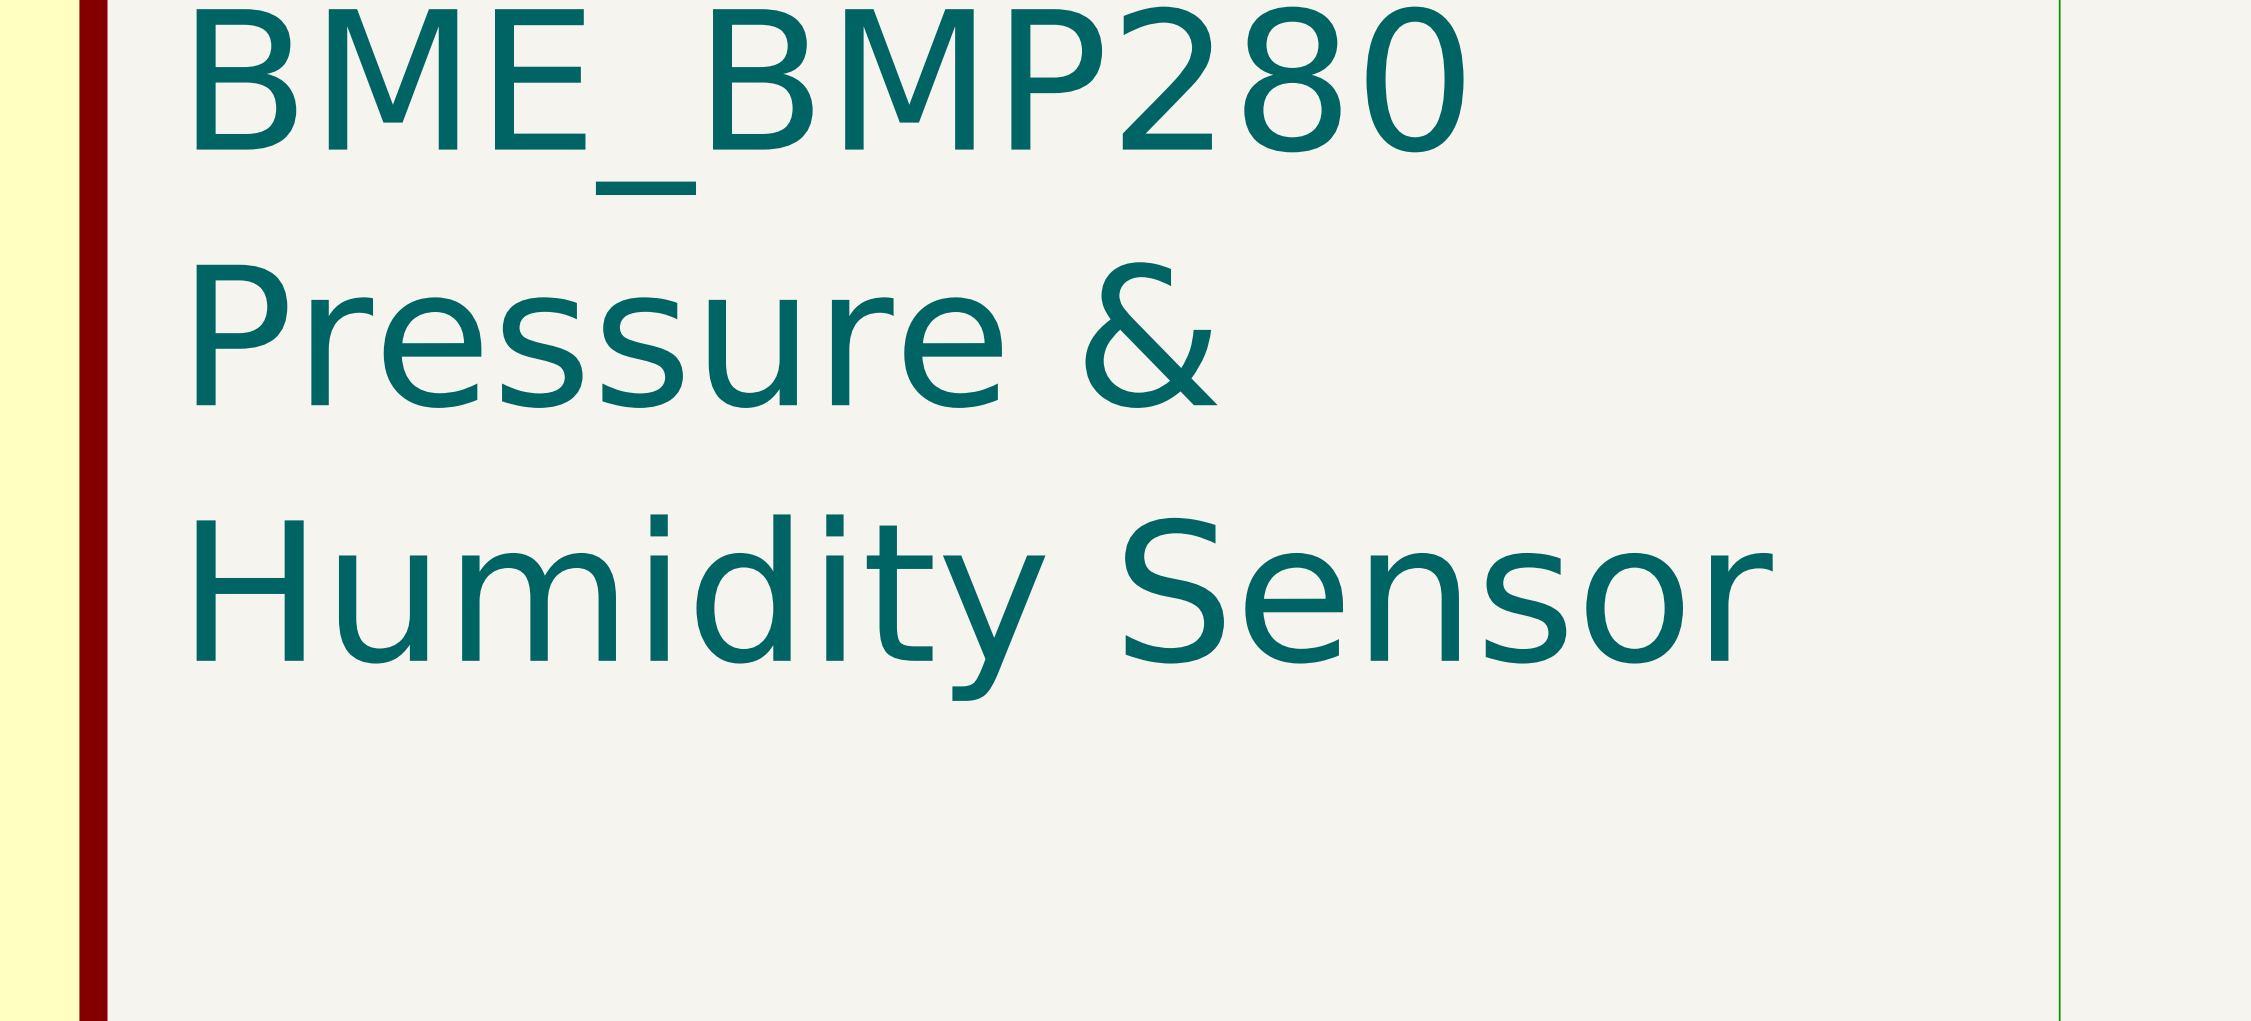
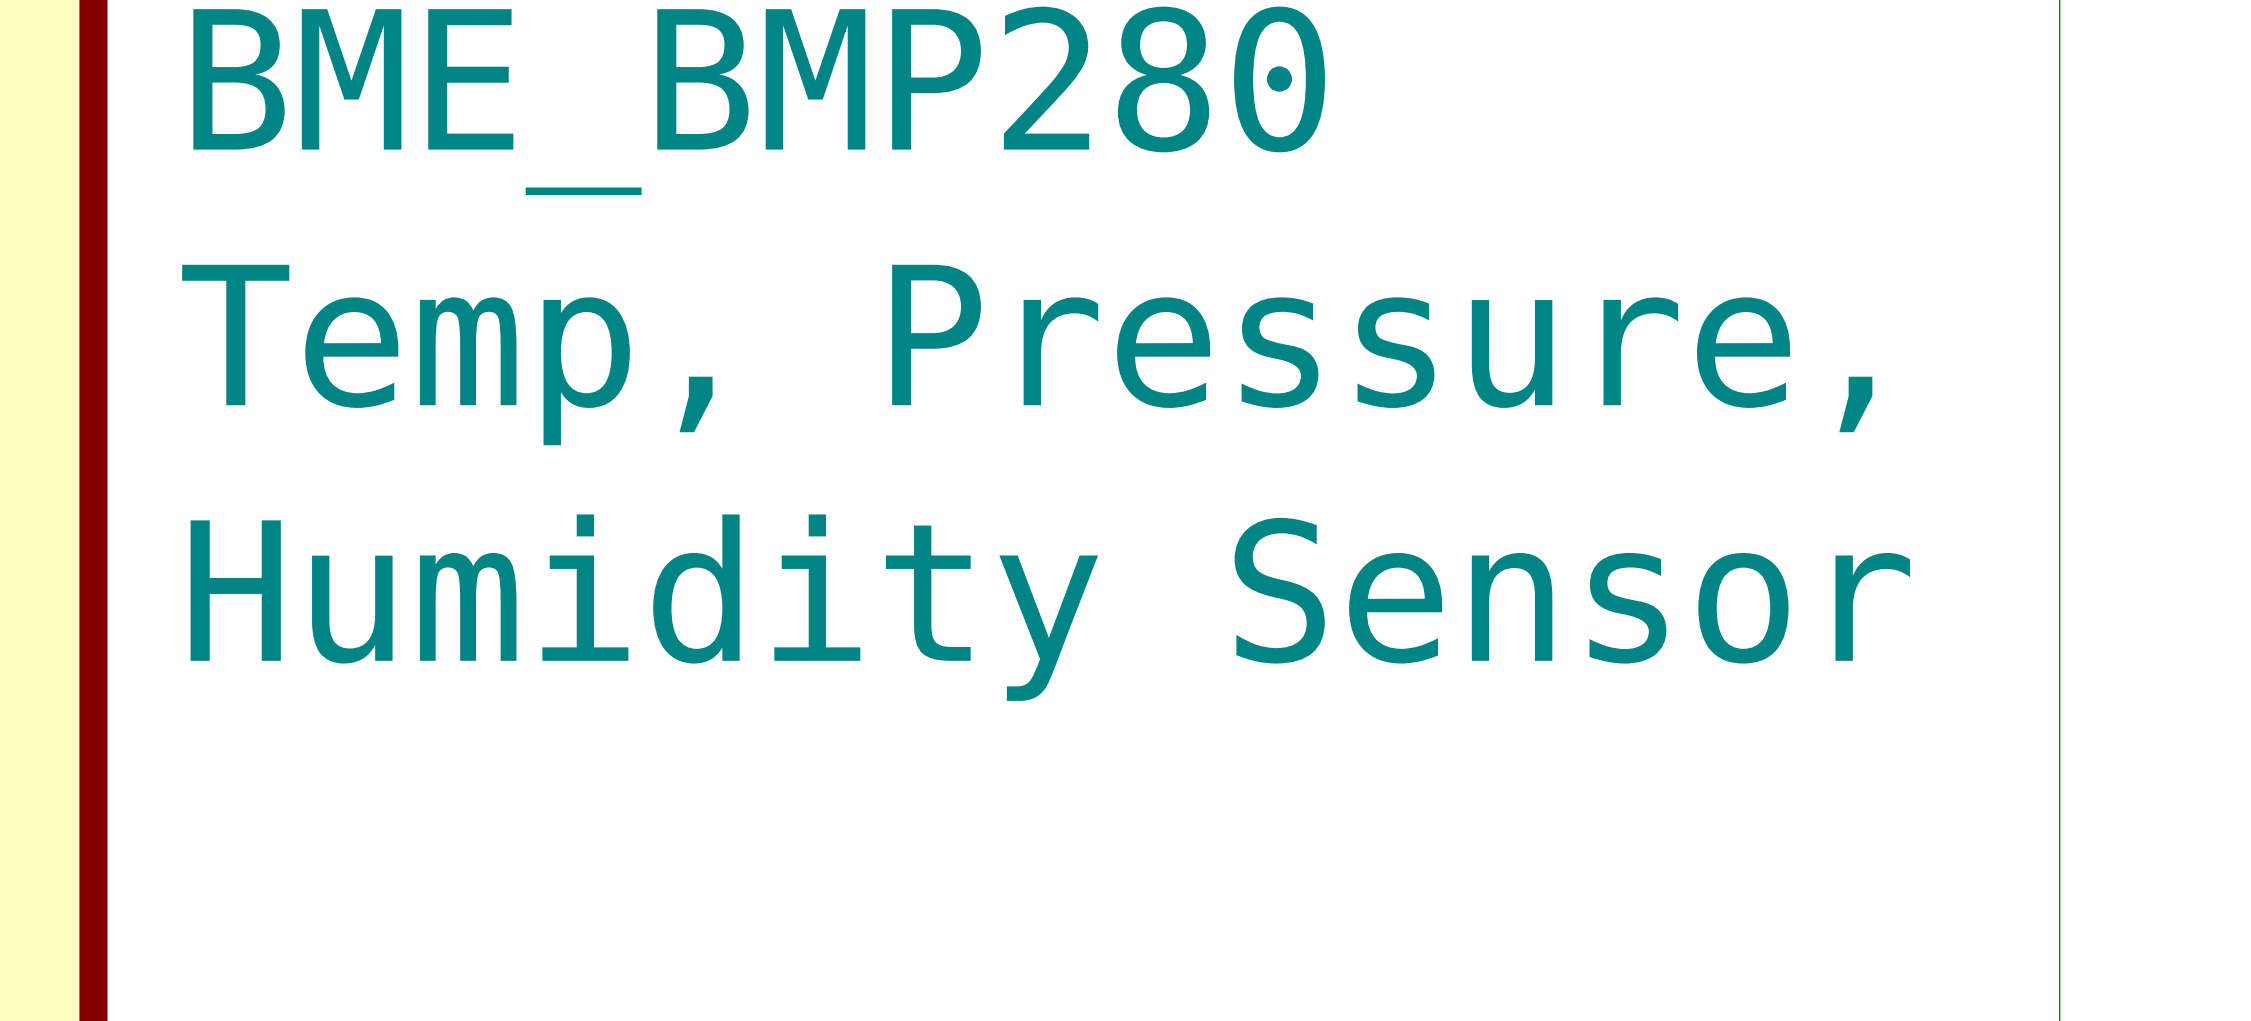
part text: Pressure & (707, 335) -> Temp, Pressure, (1027, 355)

